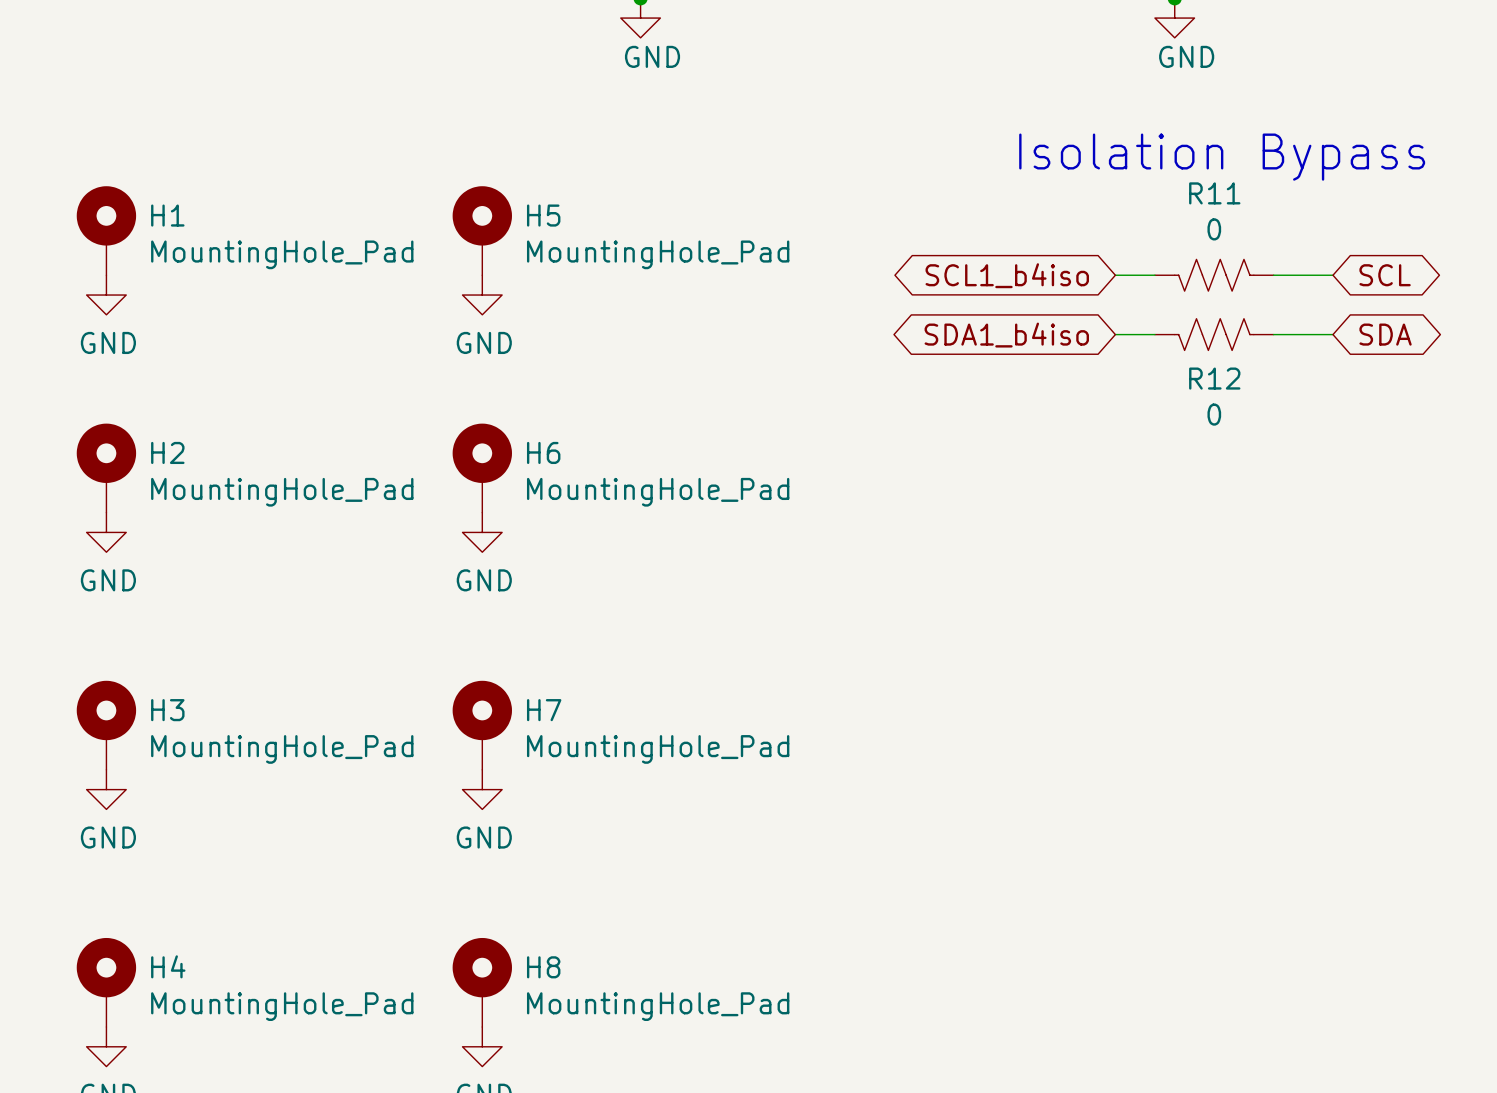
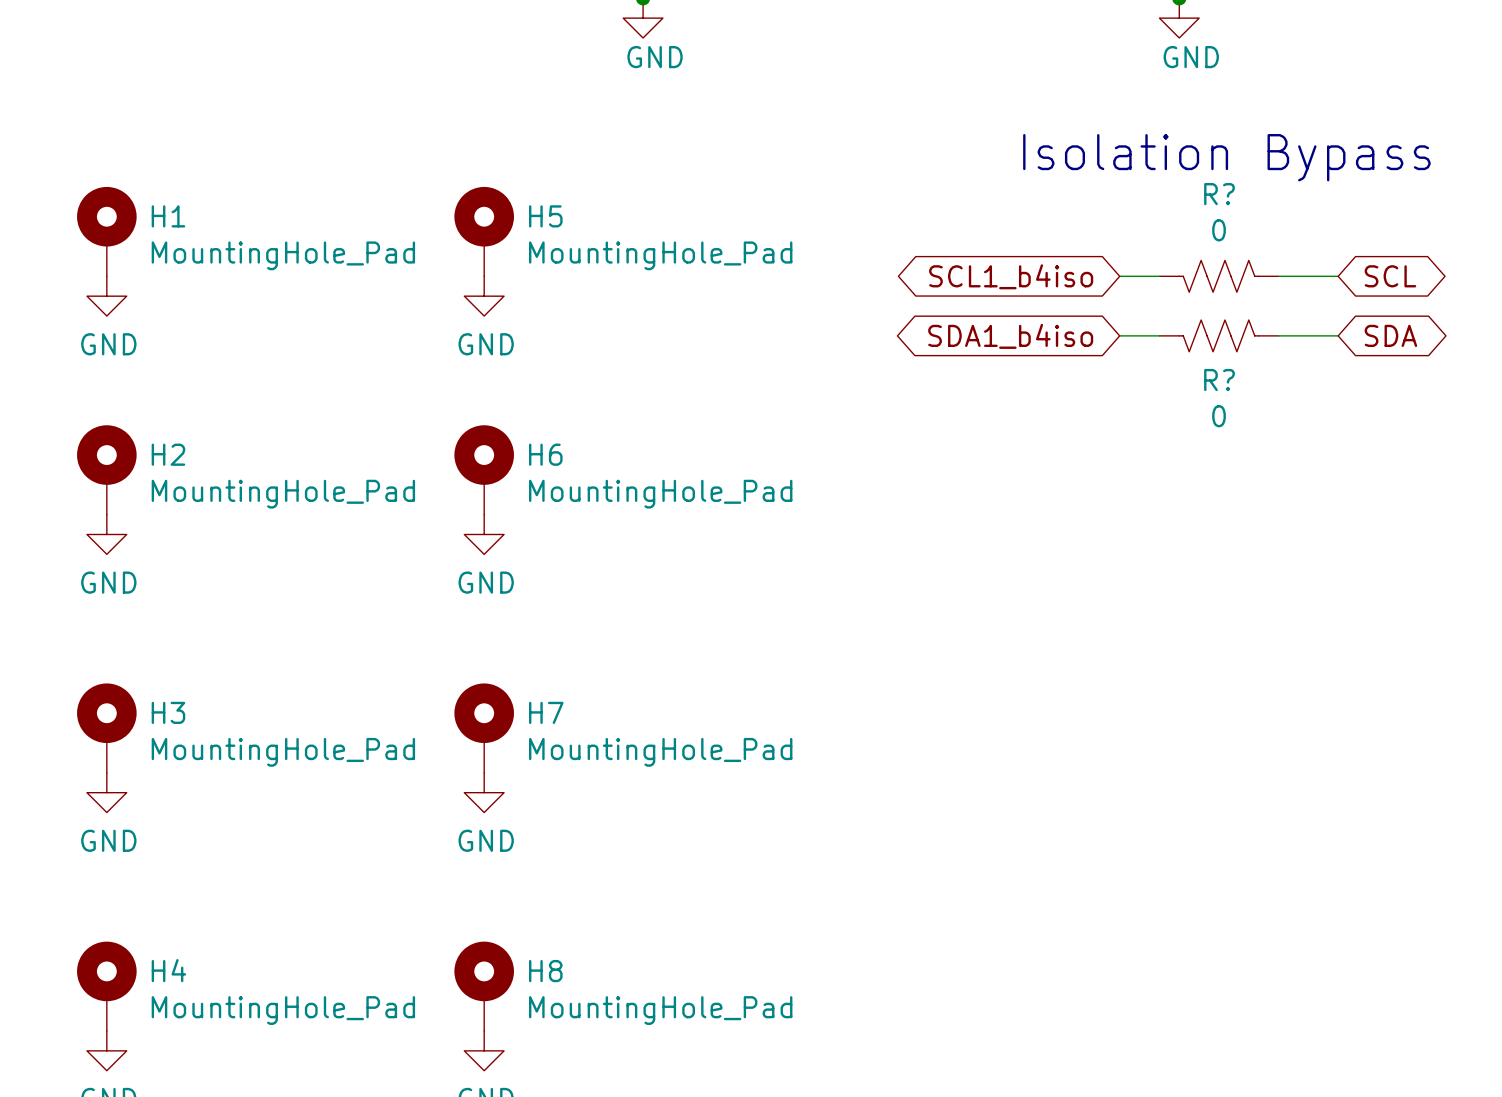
R11 name: R11 (1214, 193) -> R? (1219, 194)
R12 name: R12 (1214, 378) -> R? (1219, 380)

